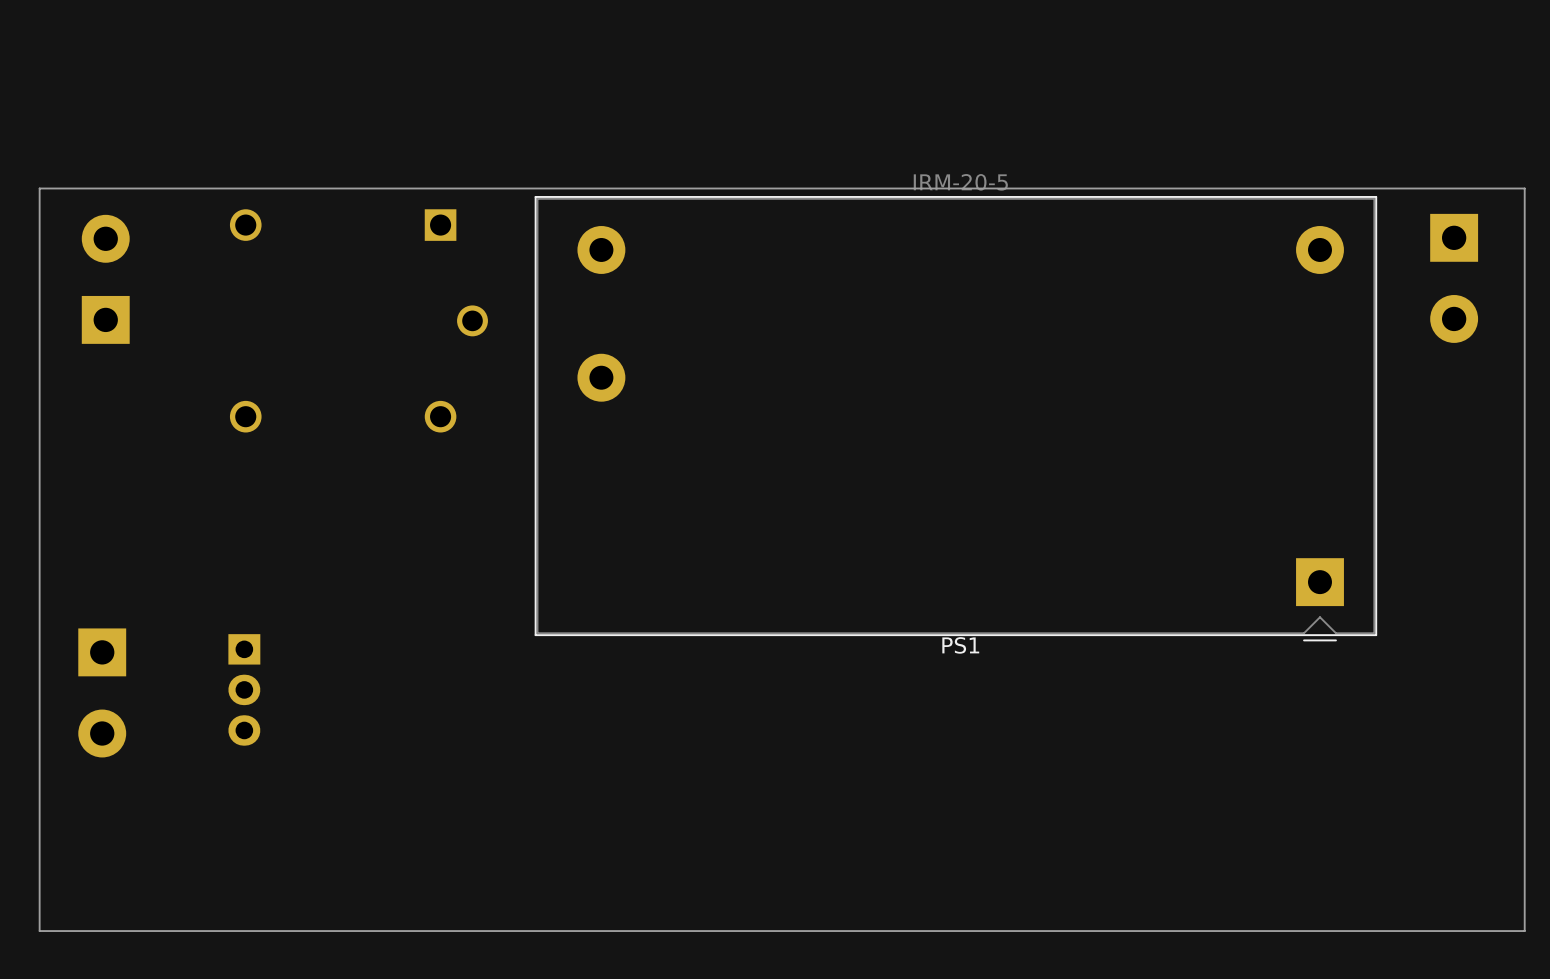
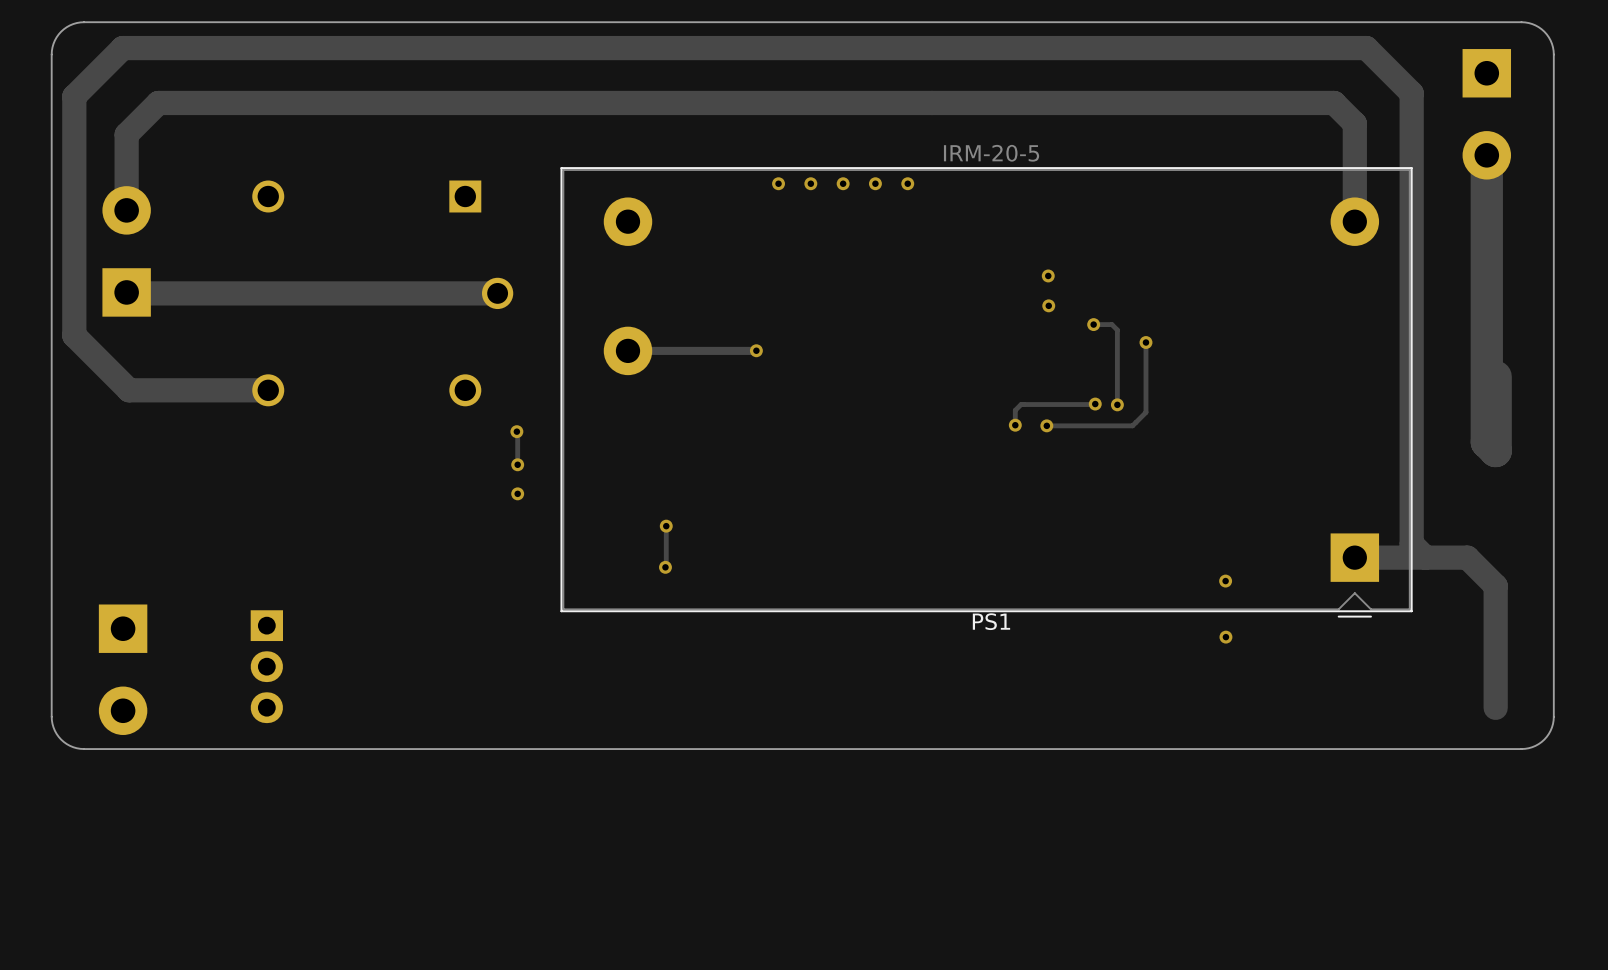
track: none -> (1486, 155) (1486, 442) (1495, 451) (1495, 376)
board edge: (1524, 188) (39, 188) (39, 931) (1524, 931) (1524, 188) -> (1521, 22) (1535, 25) (1544, 31) (1552, 43) (1553, 54) (1553, 716) (1548, 733) (1535, 745) (1521, 749) (84, 749) (66, 744) (54, 730) (51, 716) (51, 54) (56, 37) (69, 25) (84, 22) (1521, 22)
via: none -> (778, 183)
via: none -> (810, 183)
via: none -> (843, 183)
via: none -> (875, 183)
via: none -> (907, 183)
track: none -> (126, 210) (126, 134) (158, 102) (1334, 102) (1354, 123) (1354, 221)
part position: (1454, 278) -> (1486, 114)
via: none -> (1048, 275)
track: none -> (126, 292) (497, 293)
via: none -> (1048, 305)
track: none -> (1093, 324) (1111, 324) (1117, 330) (1117, 404)
via: none -> (1093, 324)
track: none -> (1145, 342) (1145, 412) (1132, 425) (1046, 425)
via: none -> (1145, 342)
track: none -> (756, 350) (628, 350)
via: none -> (756, 350)
track: none -> (268, 390) (129, 390) (74, 335) (74, 96) (122, 48) (1366, 48) (1411, 93) (1411, 543) (1425, 557)
track: none -> (1095, 404) (1021, 404) (1015, 410) (1015, 425)
via: none -> (1095, 404)
via: none -> (1117, 404)
via: none -> (1015, 425)
via: none -> (1046, 425)
track: none -> (516, 431) (517, 464)
via: none -> (516, 431)
via: none -> (517, 464)
via: none -> (517, 493)
track: none -> (666, 526) (665, 567)
via: none -> (666, 526)
track: none -> (1354, 557) (1467, 557) (1495, 585) (1495, 707)
via: none -> (665, 567)
via: none -> (1225, 581)
via: none -> (1225, 637)

